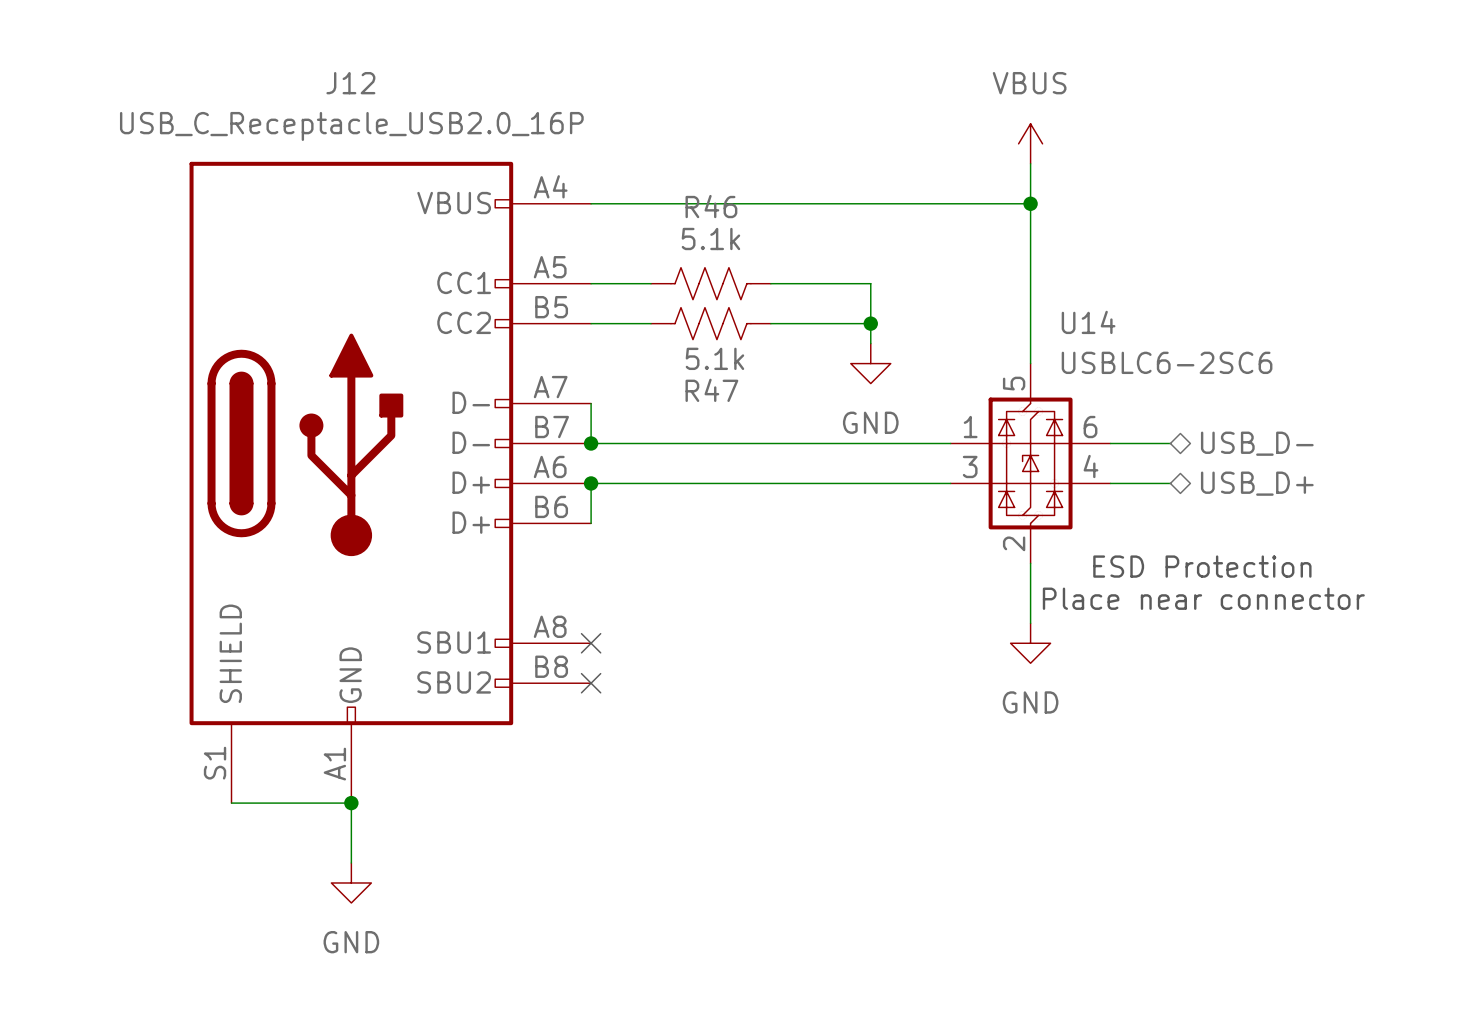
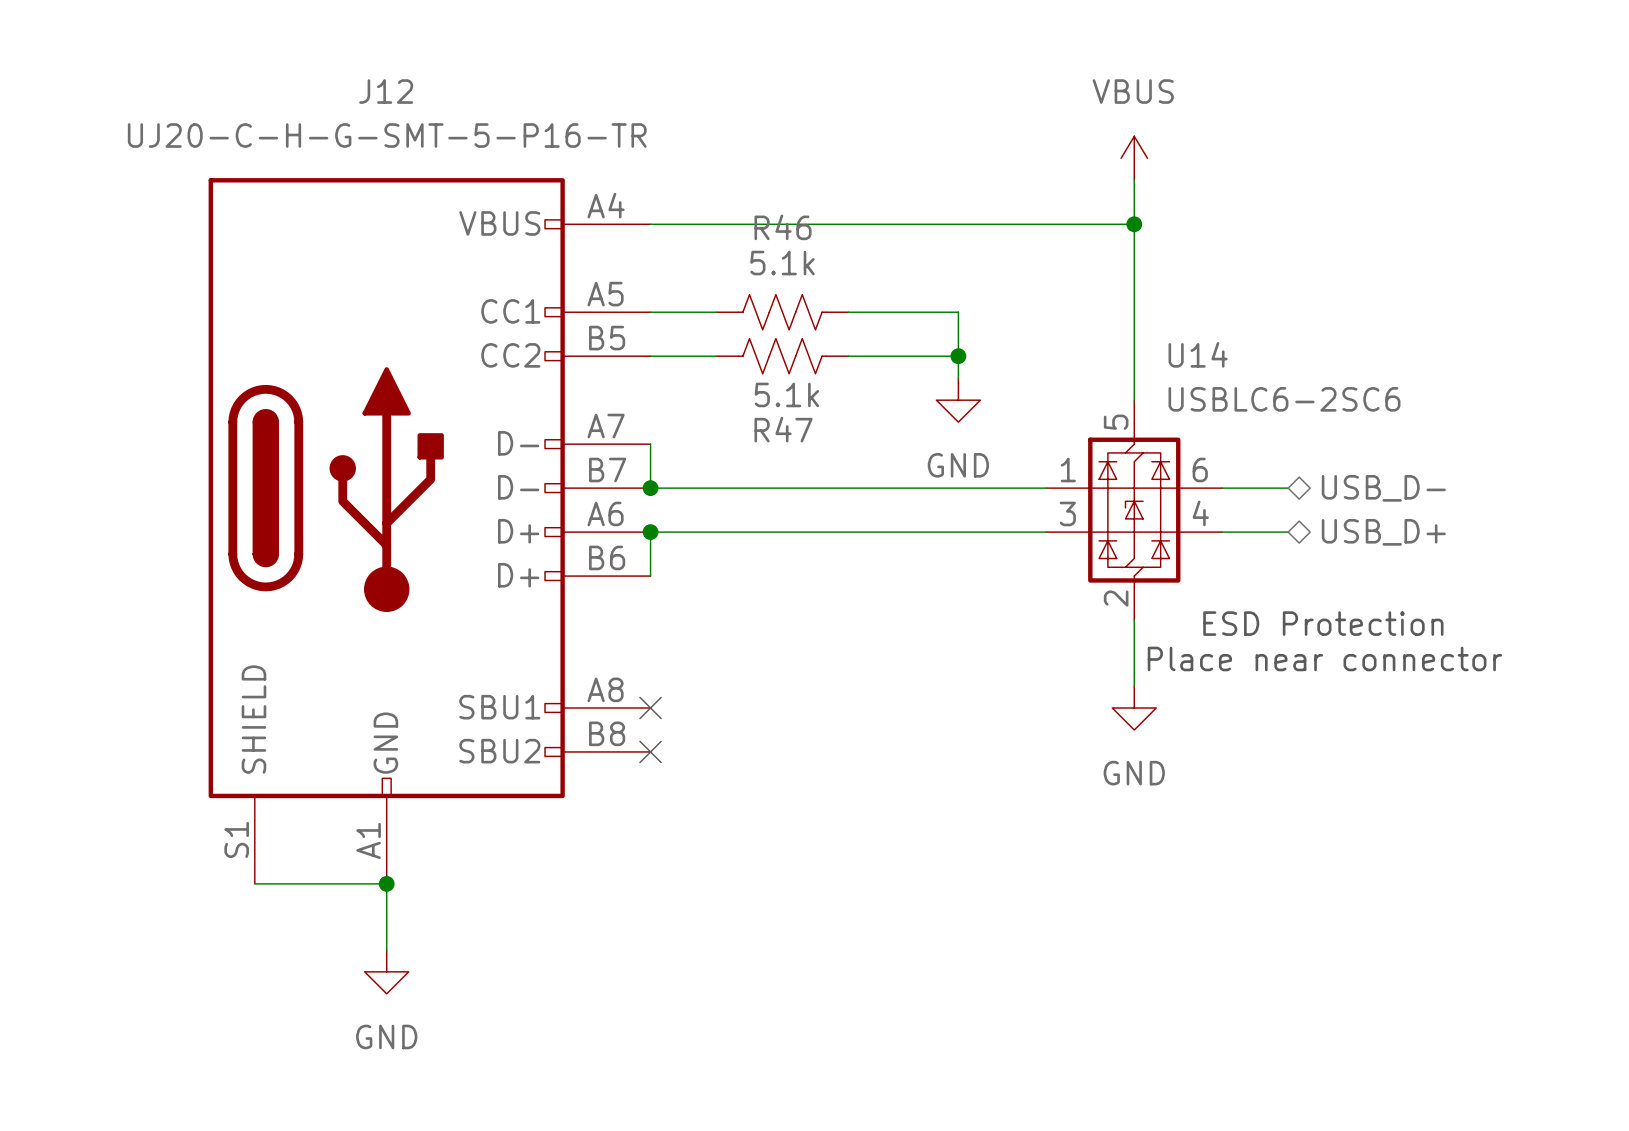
J12 value: USB_C_Receptacle_USB2.0_16P (351, 126) -> UJ20-C-H-G-SMT-5-P16-TR (387, 135)

